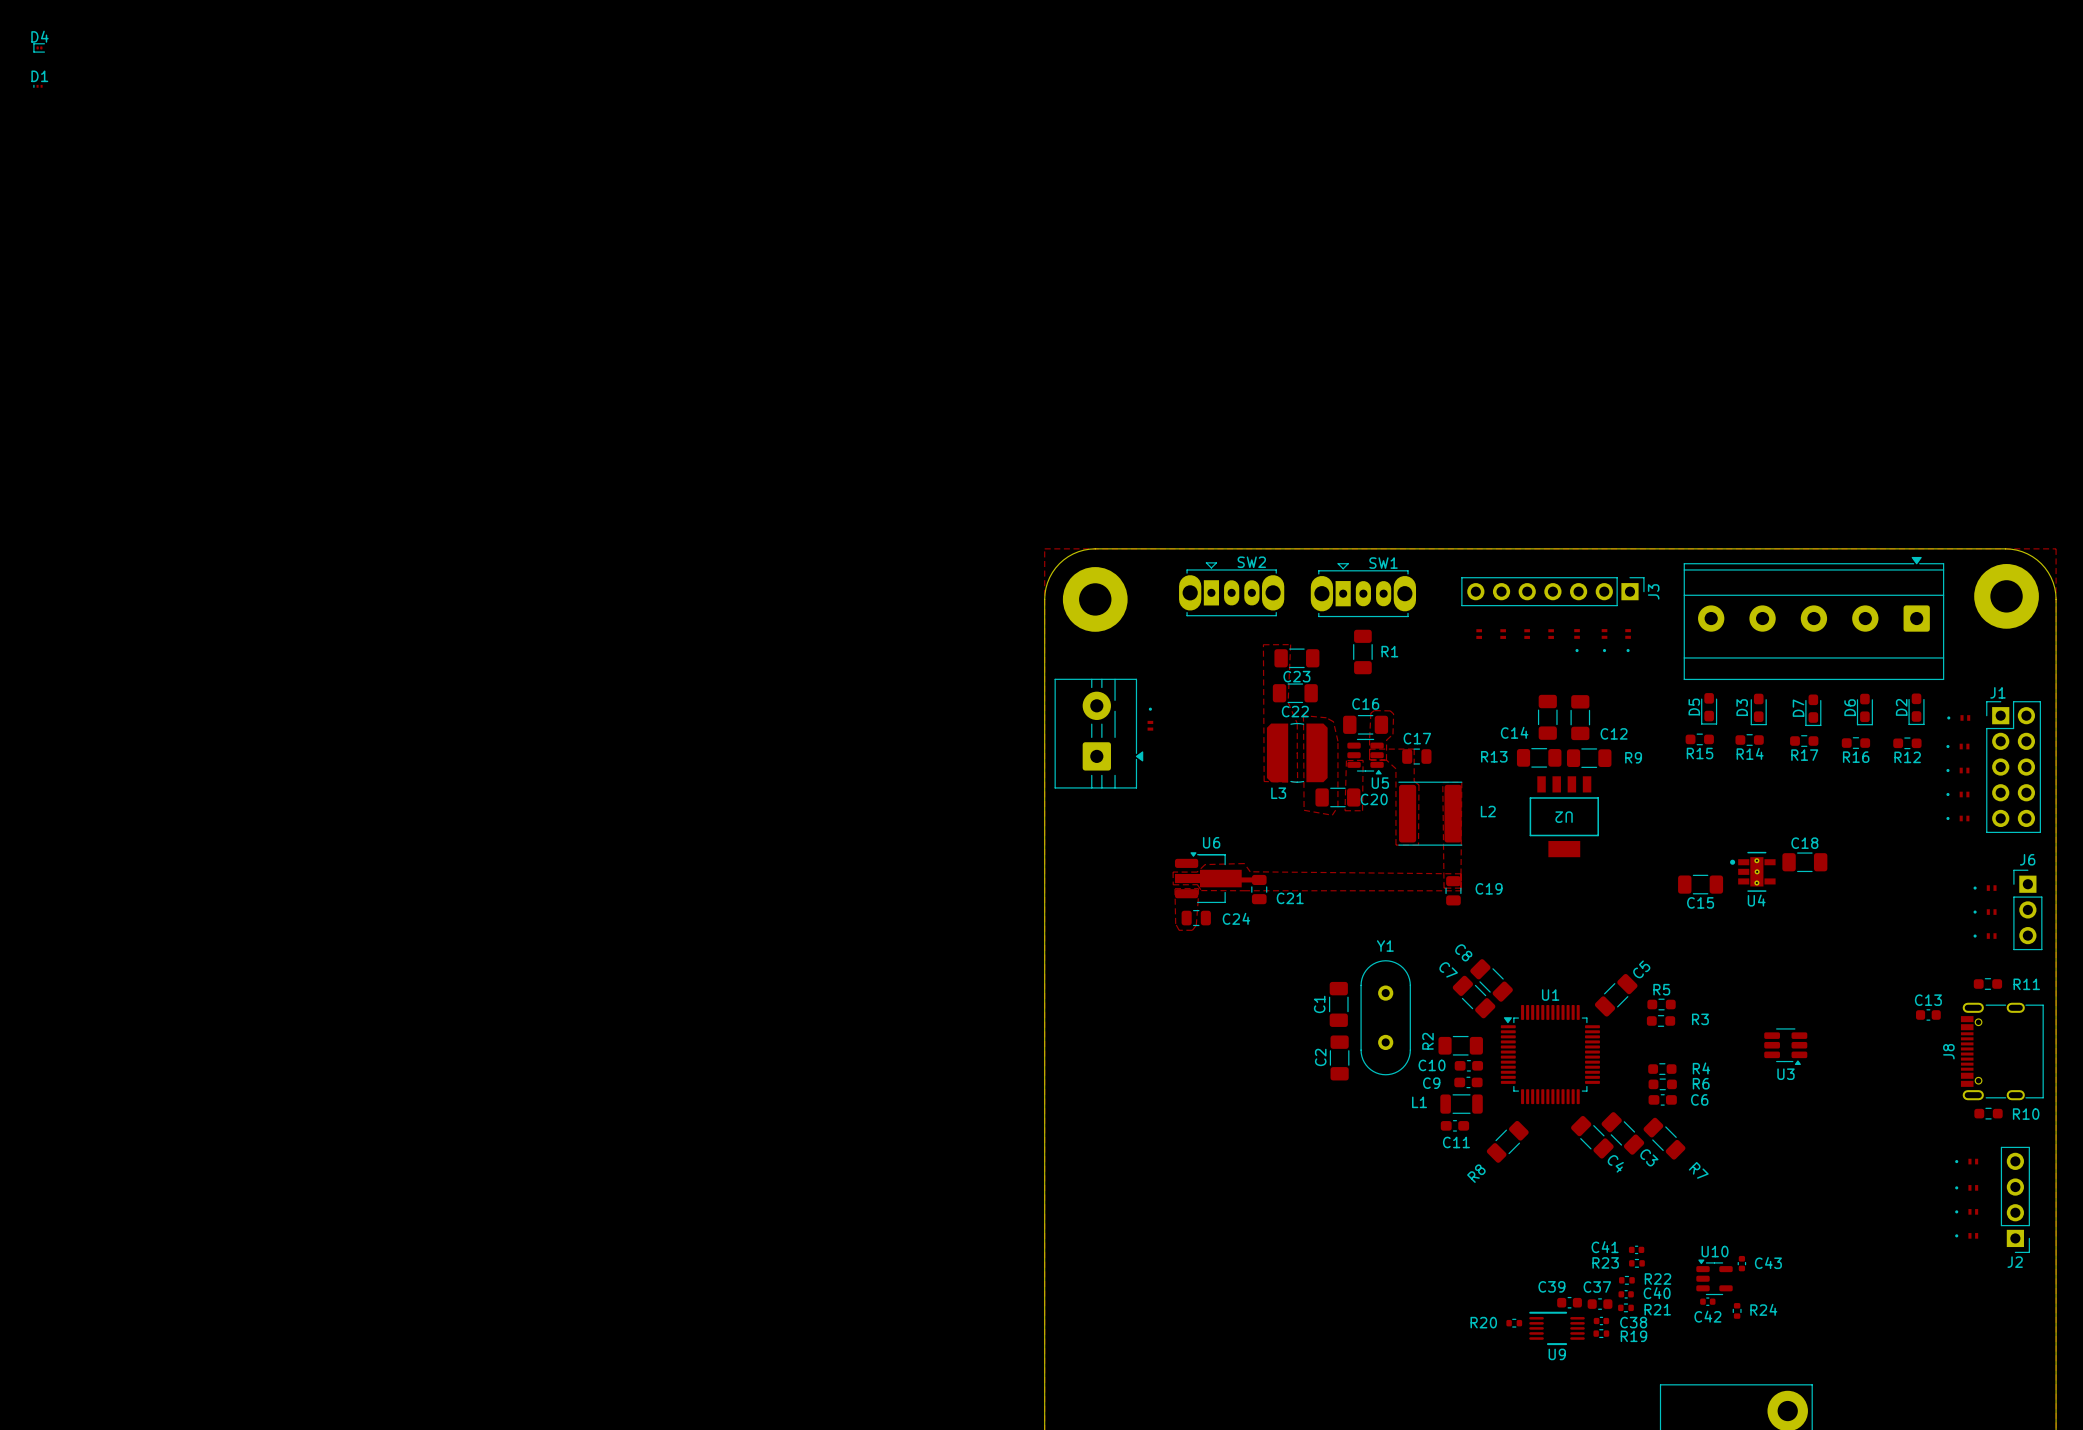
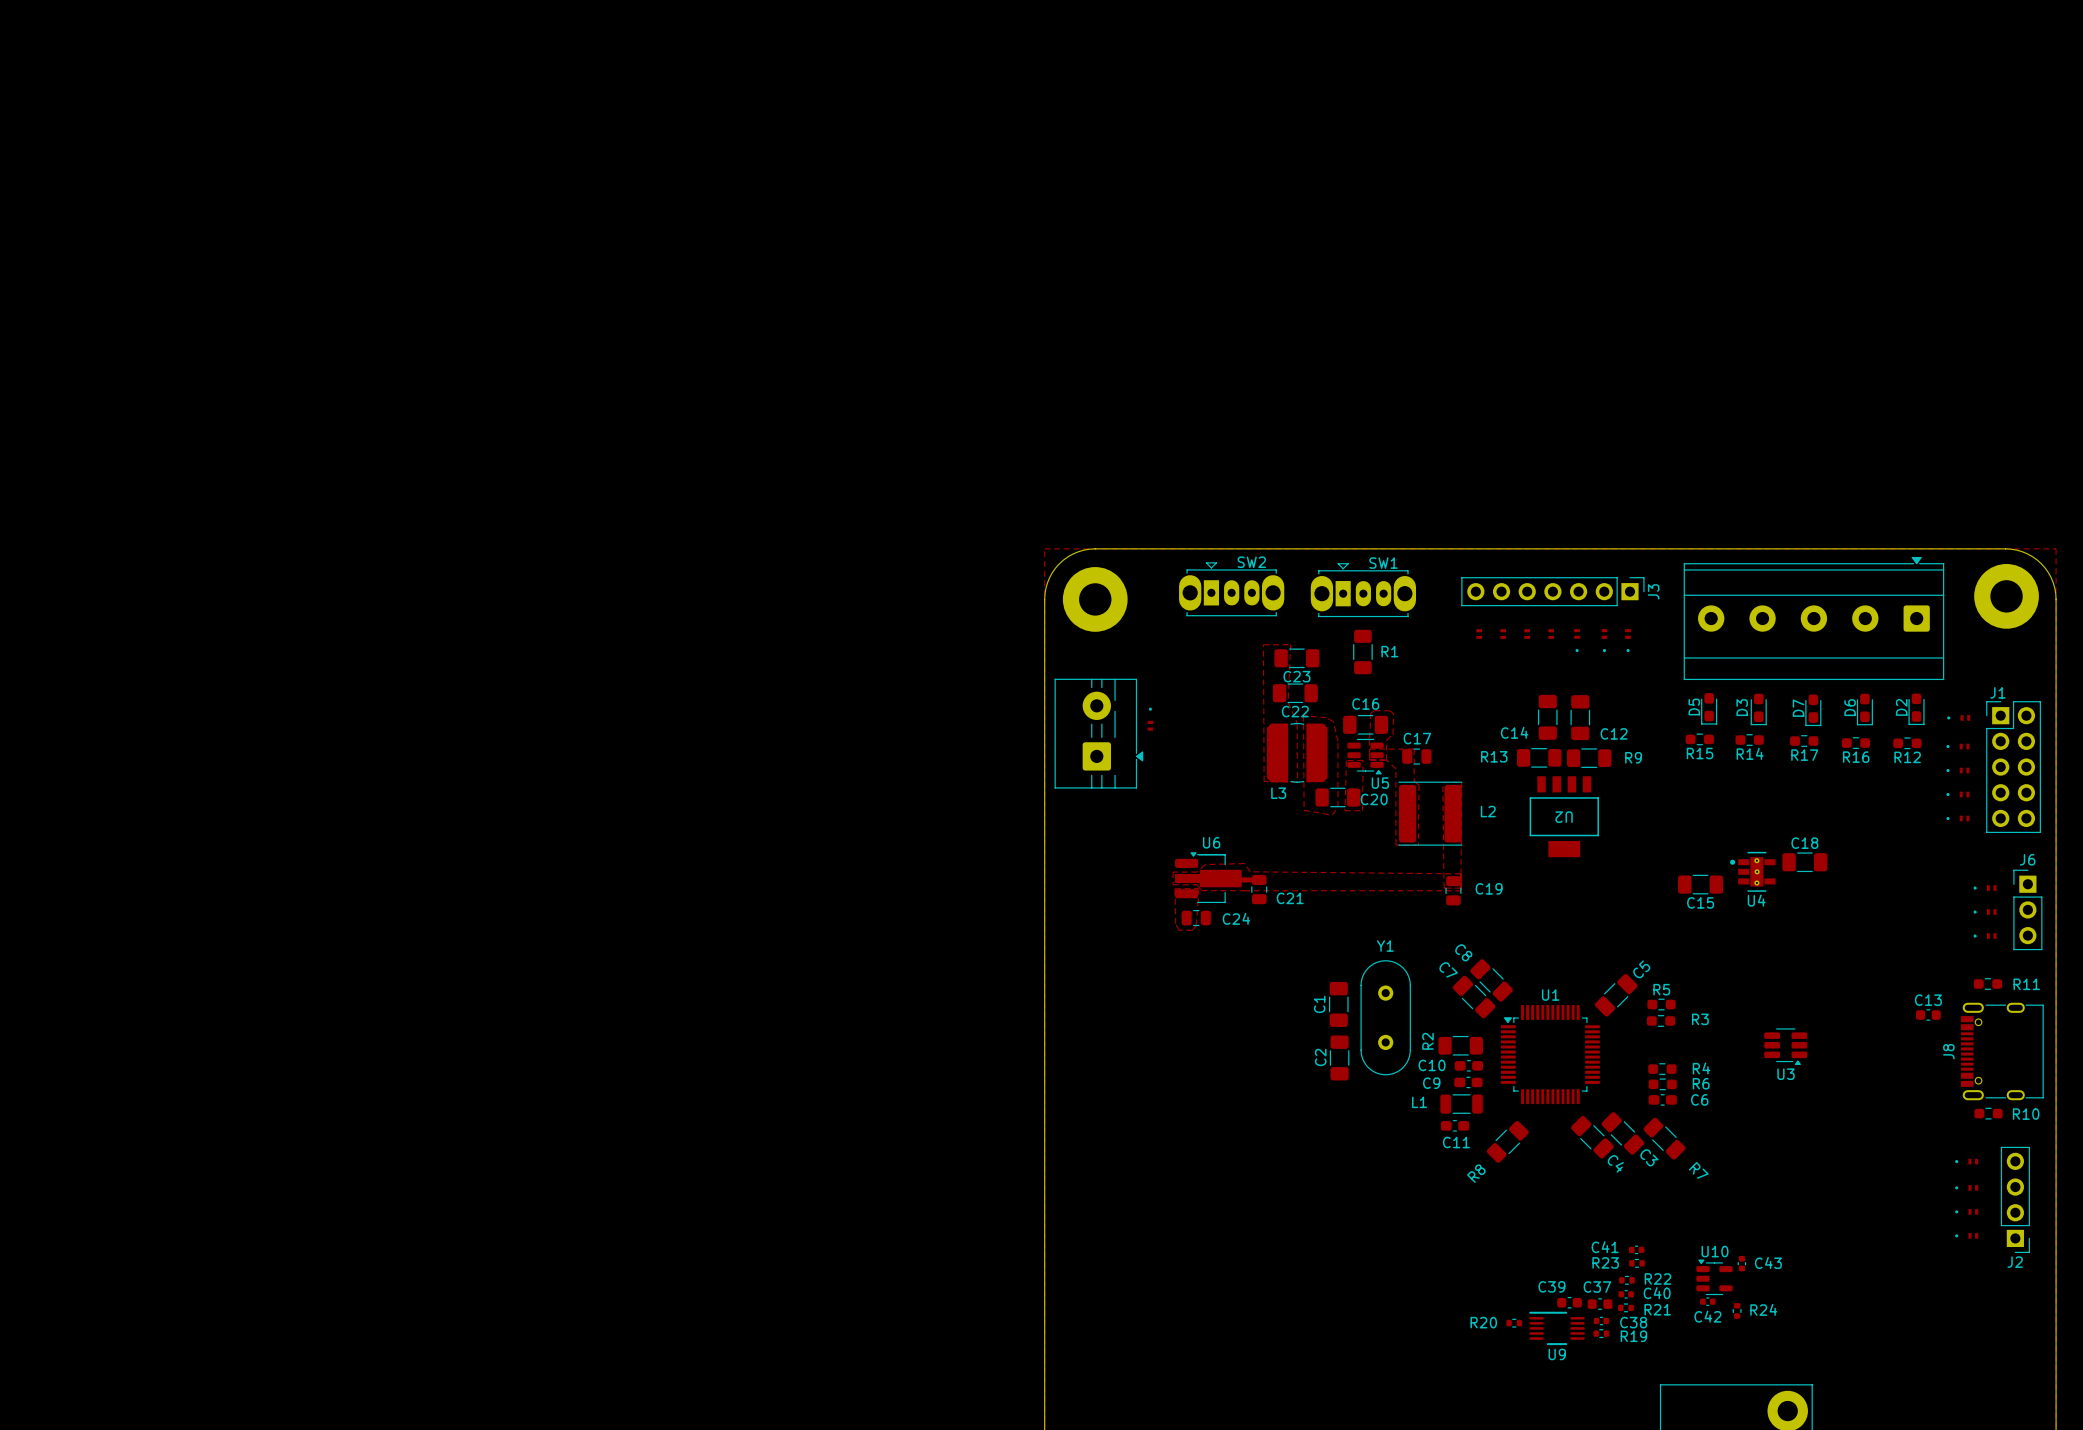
D4: (39, 47) -> none
D1: (37, 86) -> none

